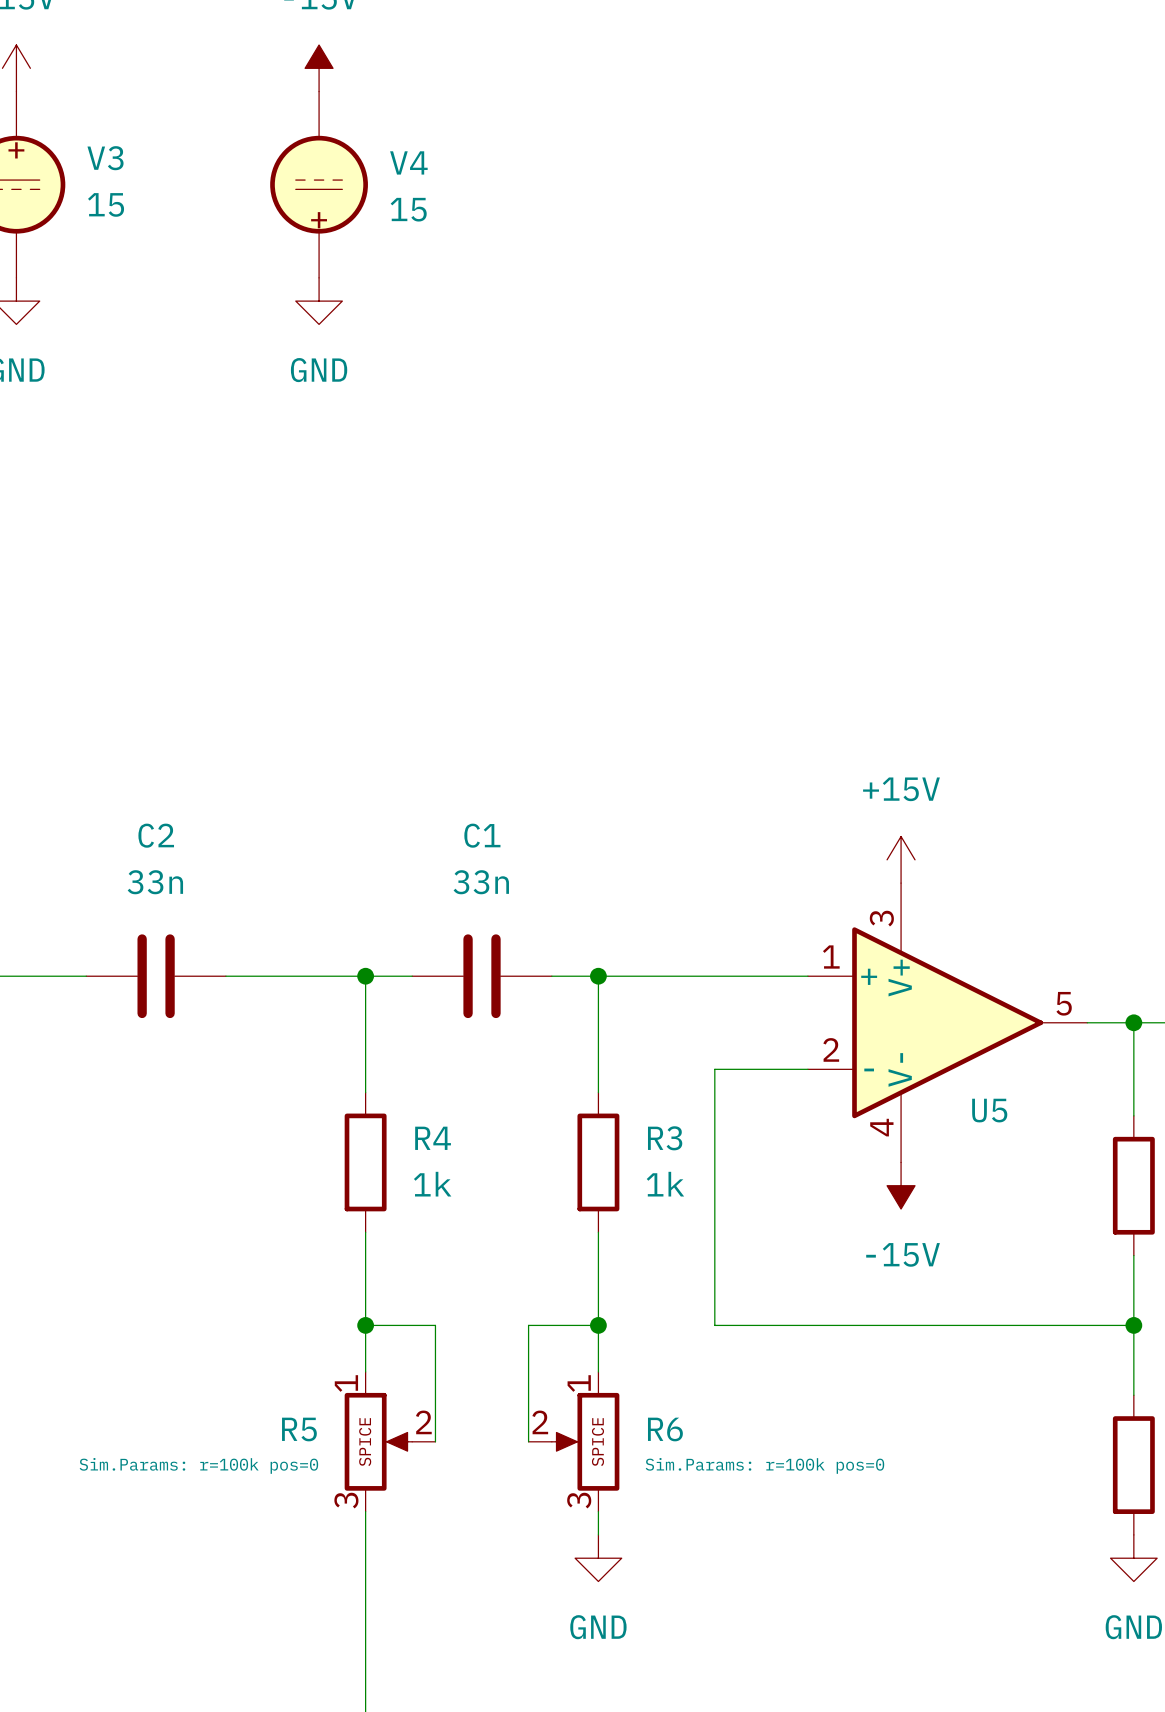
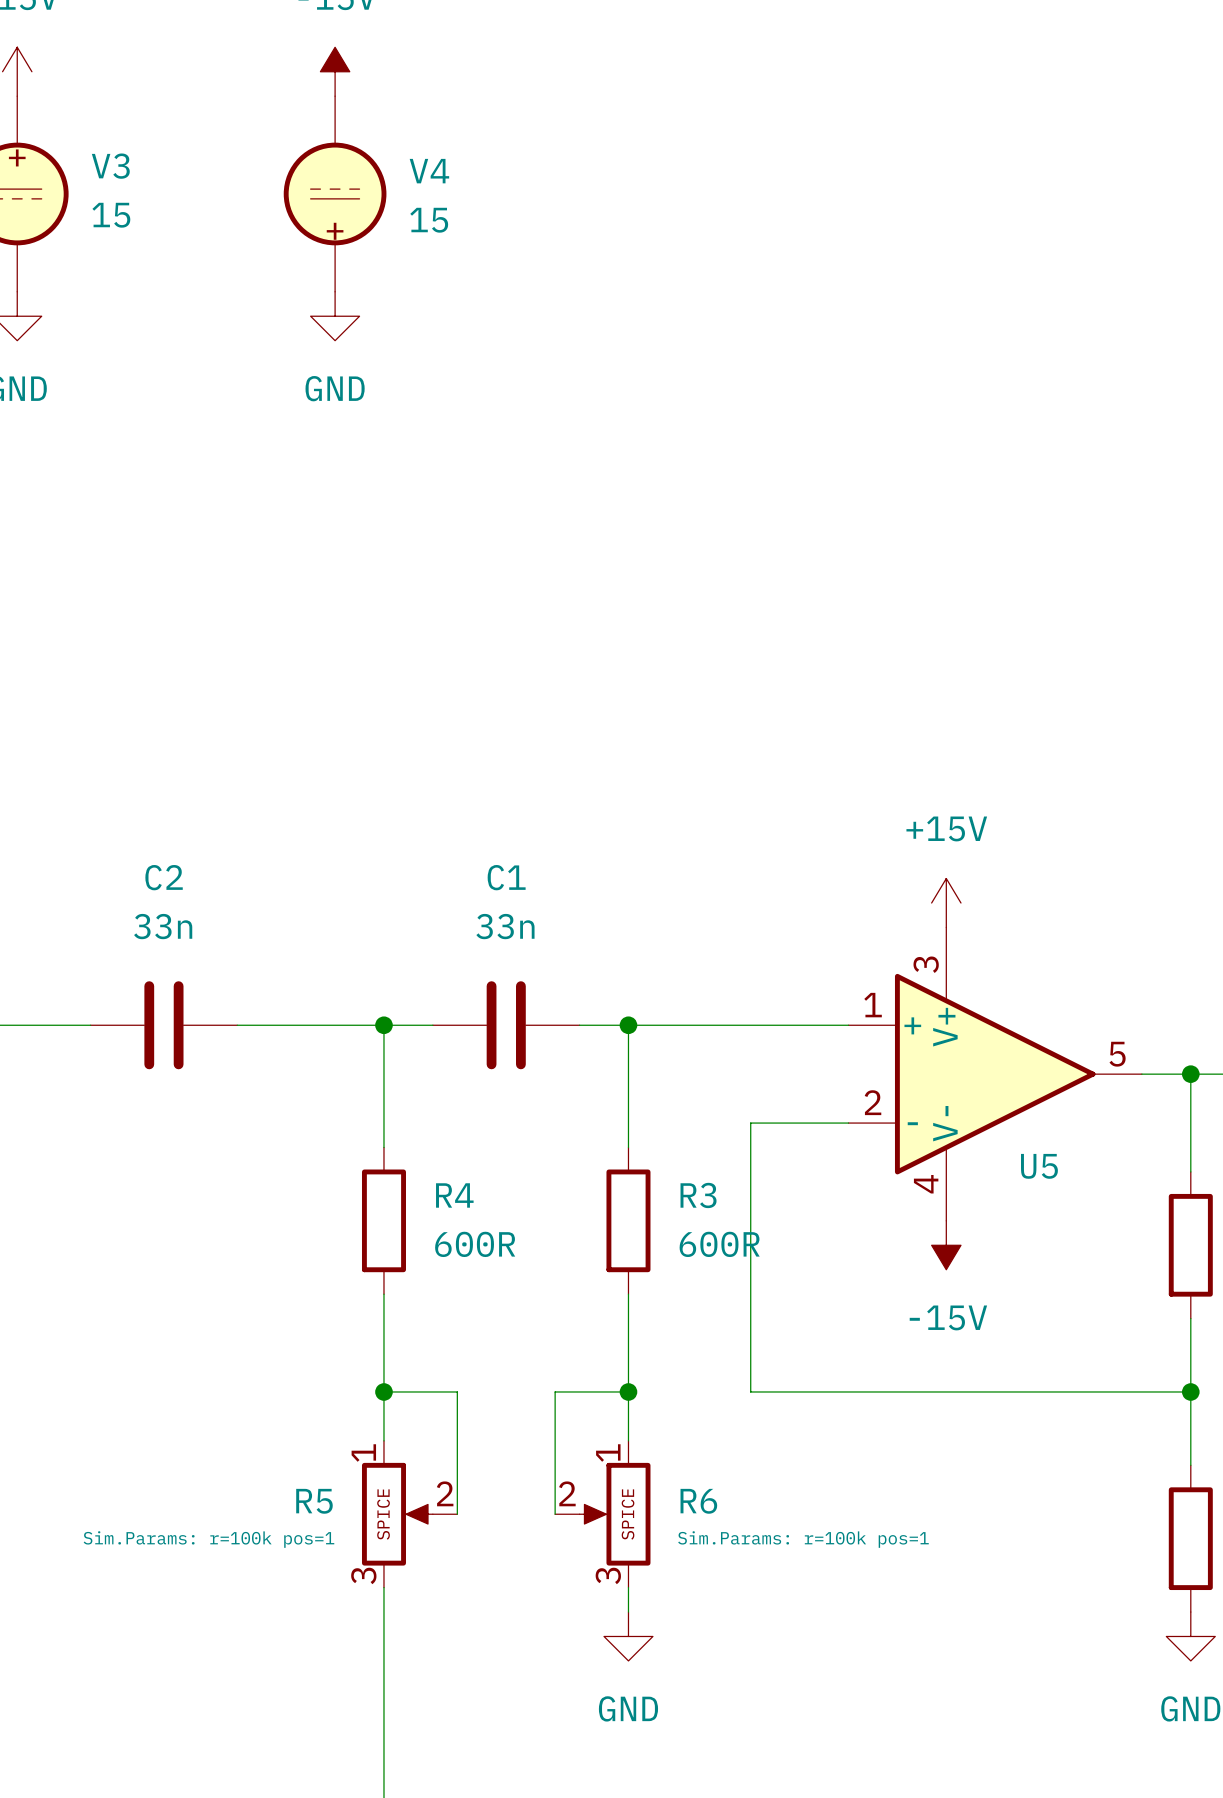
R4 value: 1k (432, 1184) -> 600R (475, 1244)
R3 value: 1k (665, 1184) -> 600R (719, 1244)
R5 text: Sim.Params: r=100k pos=0 (198, 1465) -> Sim.Params: r=100k pos=1 (208, 1539)
R6 text: Sim.Params: r=100k pos=0 (764, 1465) -> Sim.Params: r=100k pos=1 (803, 1539)

